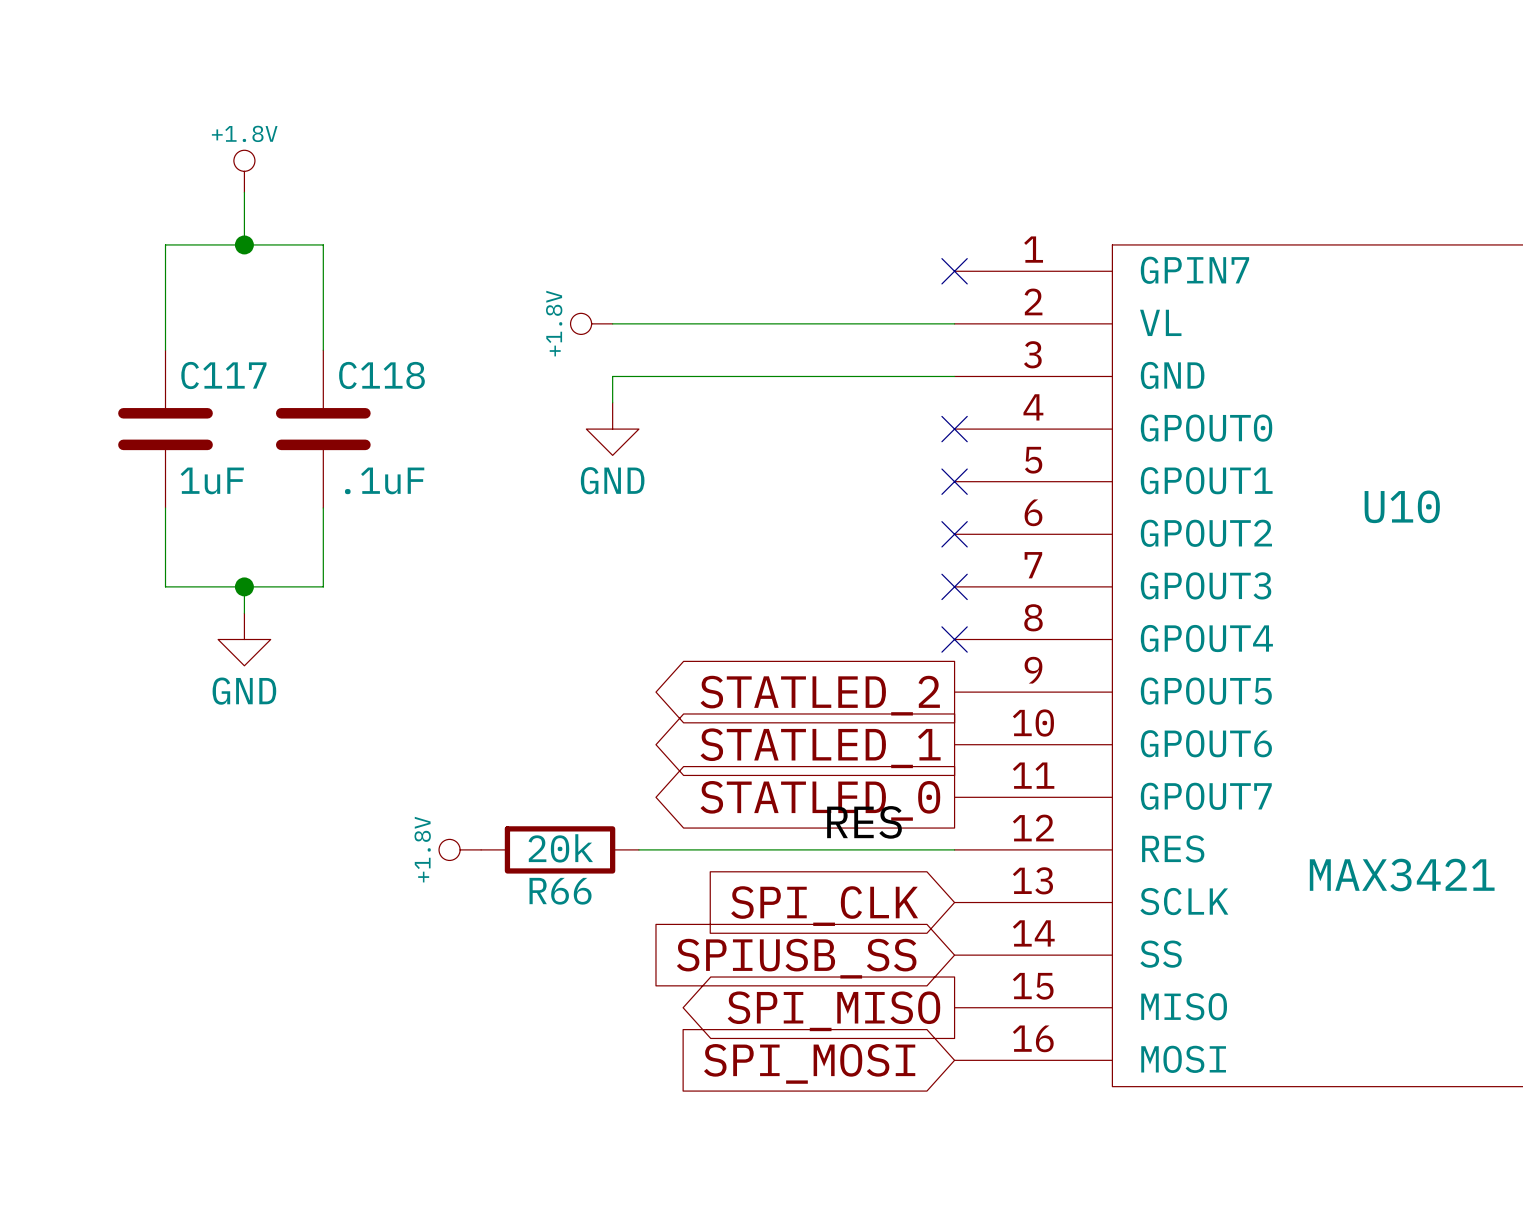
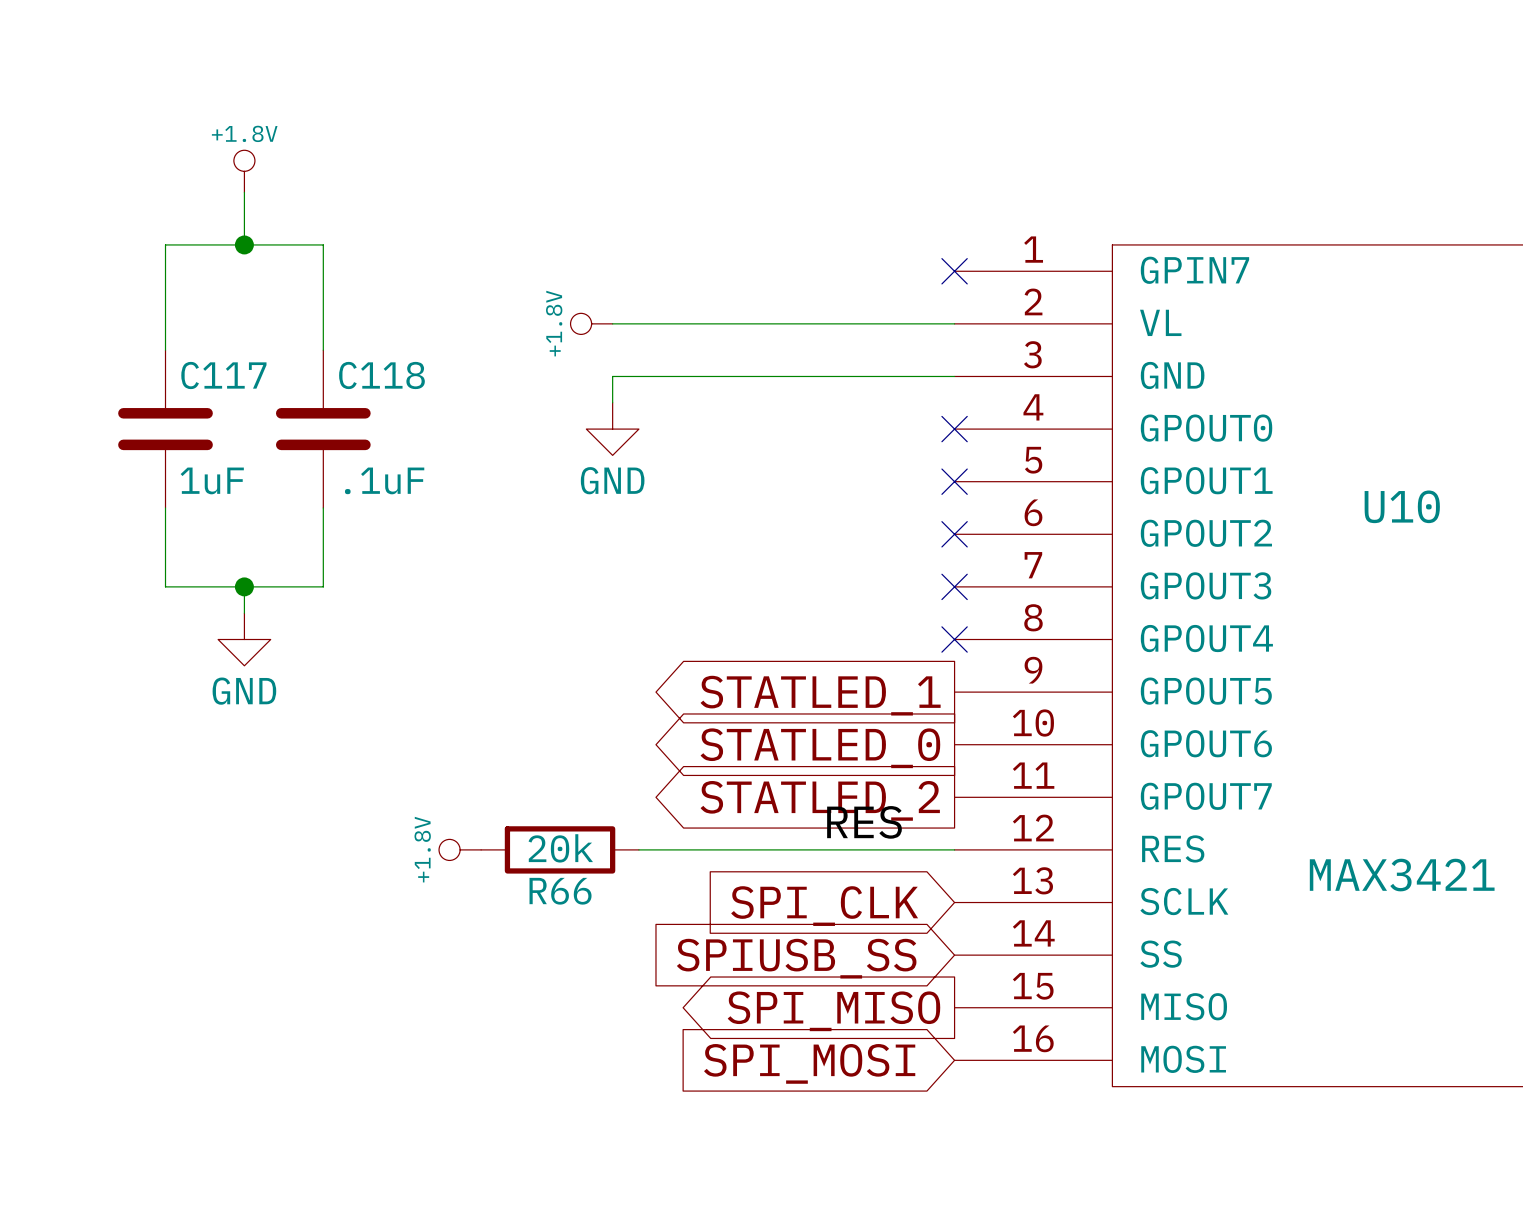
global label: STATLED_2 (820, 695) -> STATLED_1 (820, 695)
global label: STATLED_1 (820, 748) -> STATLED_0 (820, 748)
global label: STATLED_0 (820, 800) -> STATLED_2 (820, 800)

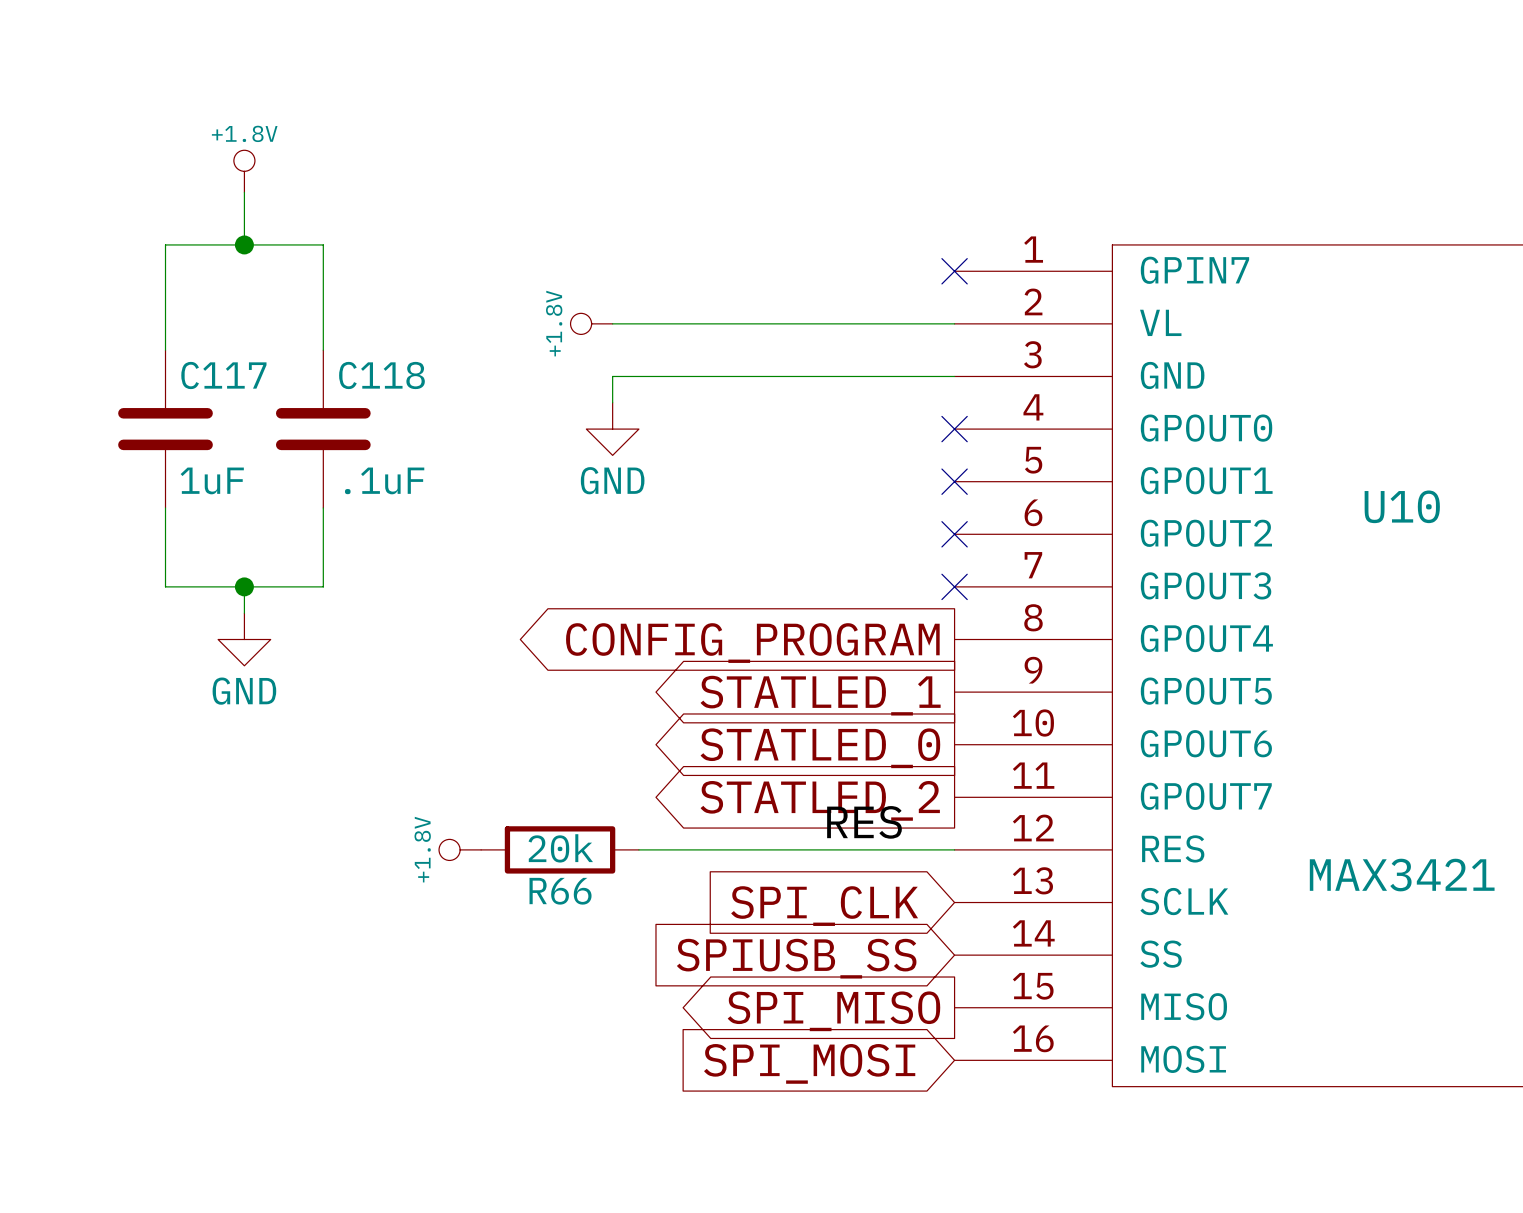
no-connect mark: (954, 639) -> none
global label: none -> CONFIG_PROGRAM (752, 643)

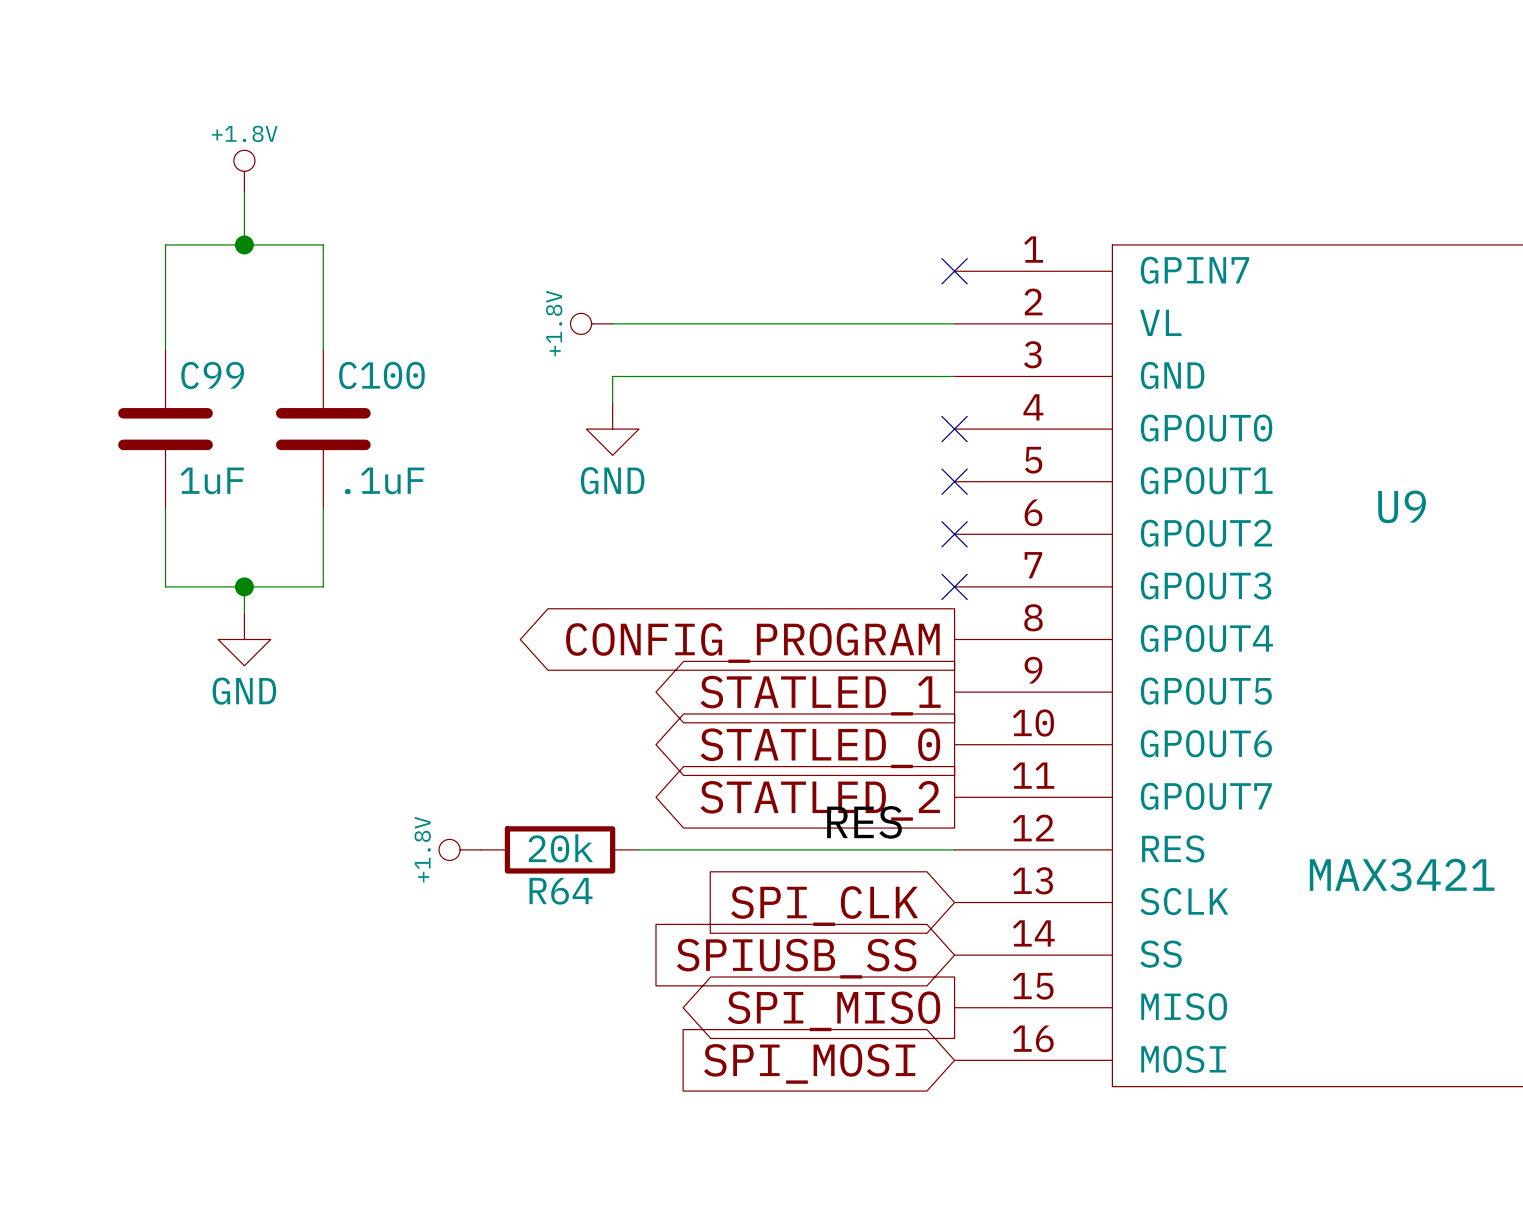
C117 name: C117 (223, 375) -> C99 (212, 375)
C118 name: C118 (381, 375) -> C100 (381, 375)
U10 name: U10 (1402, 506) -> U9 (1402, 506)
R66 name: R66 (560, 891) -> R64 (561, 891)

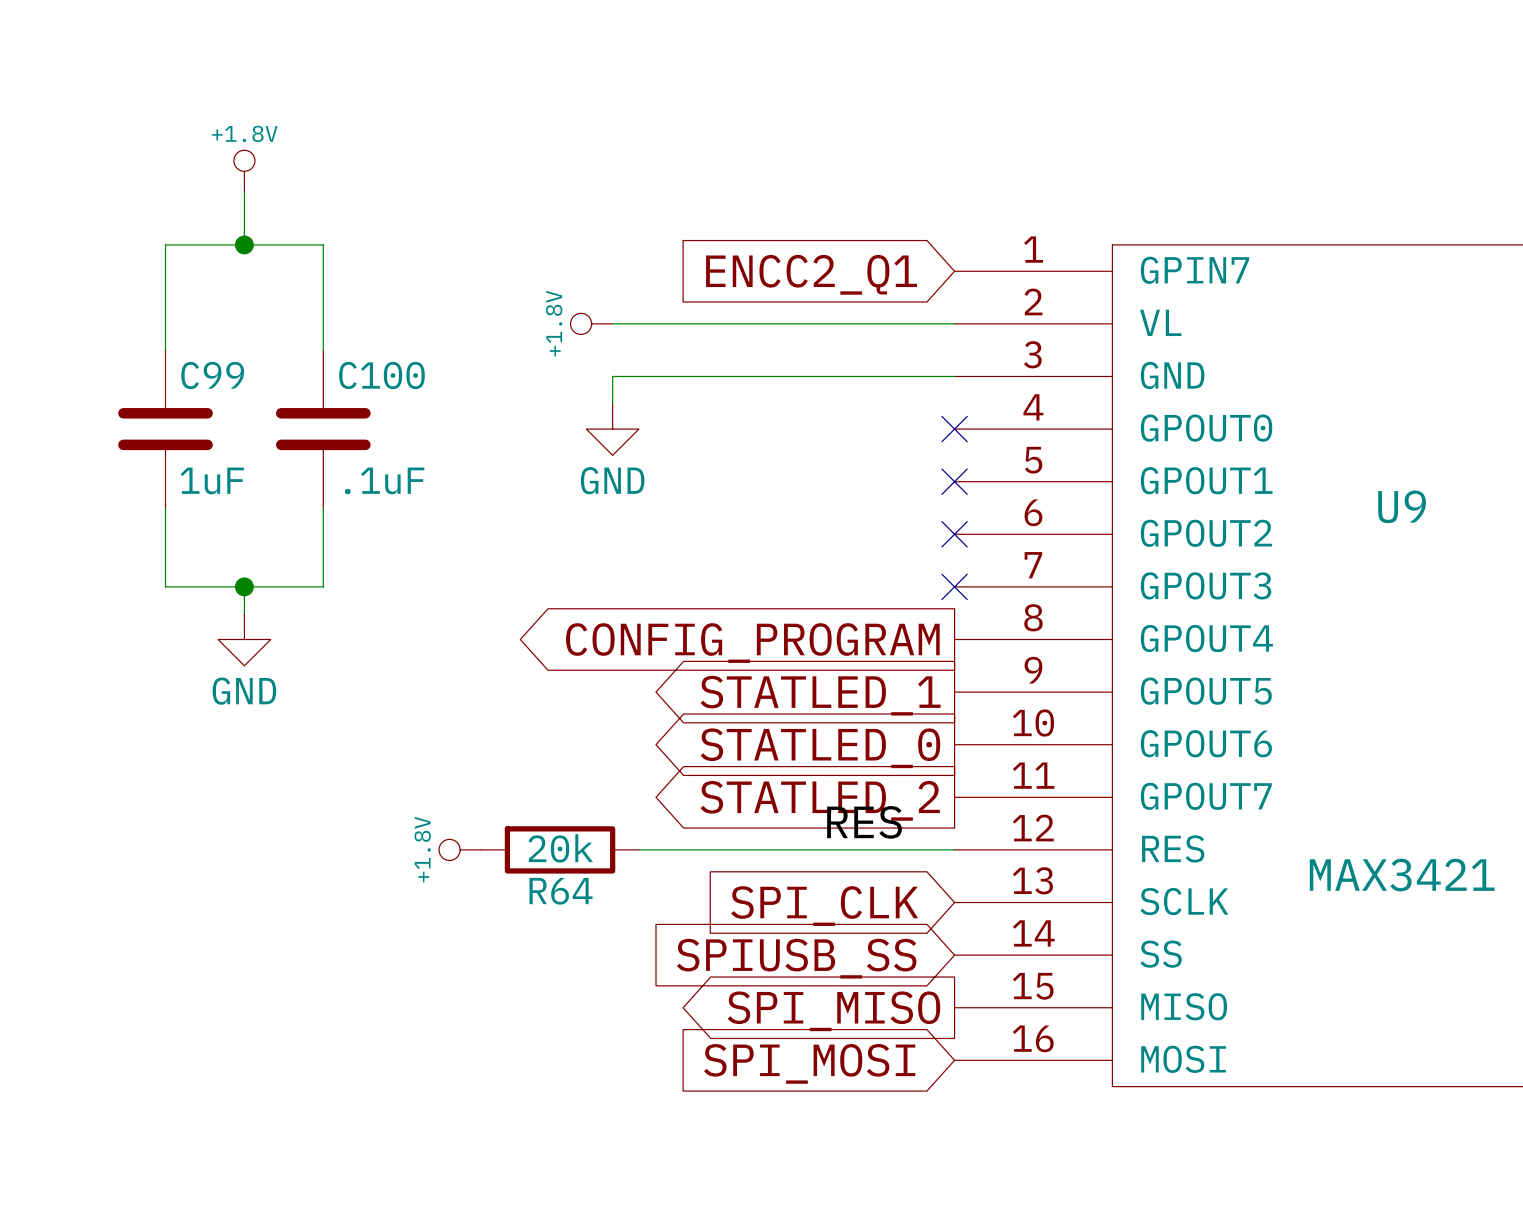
no-connect mark: (954, 271) -> none
global label: none -> ENCC2_Q1 (811, 274)

